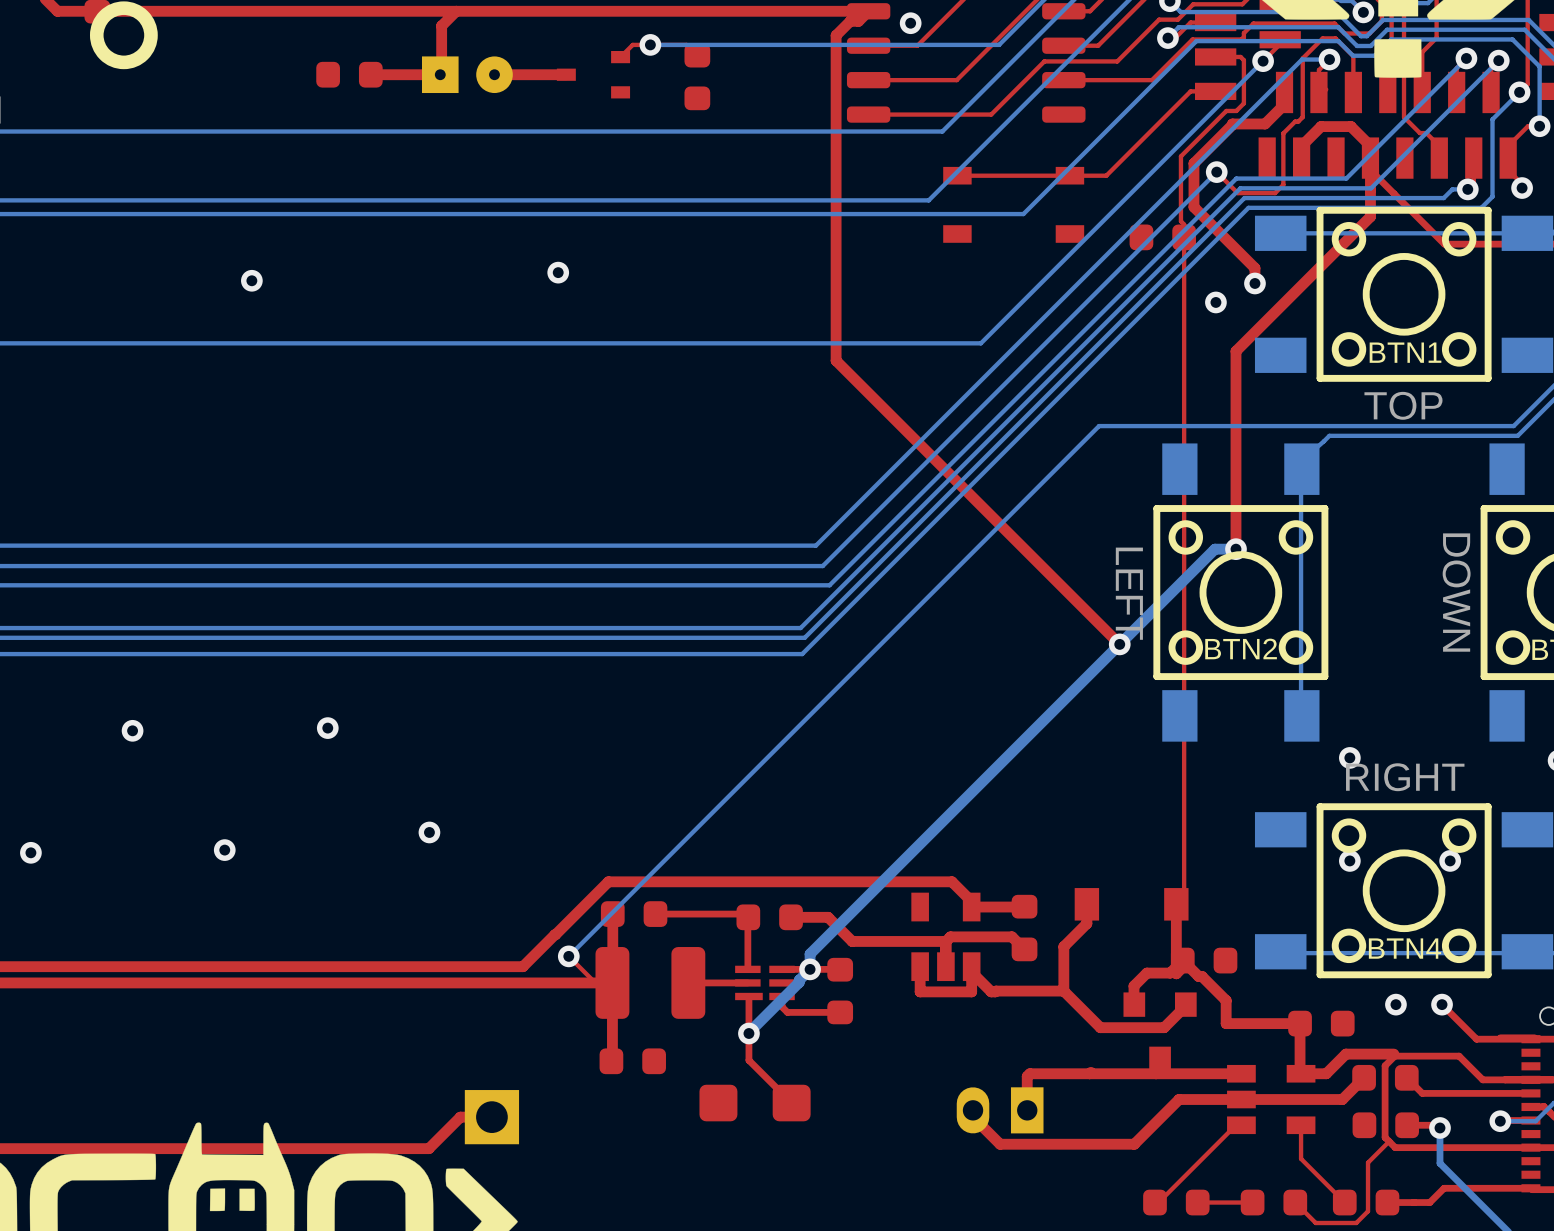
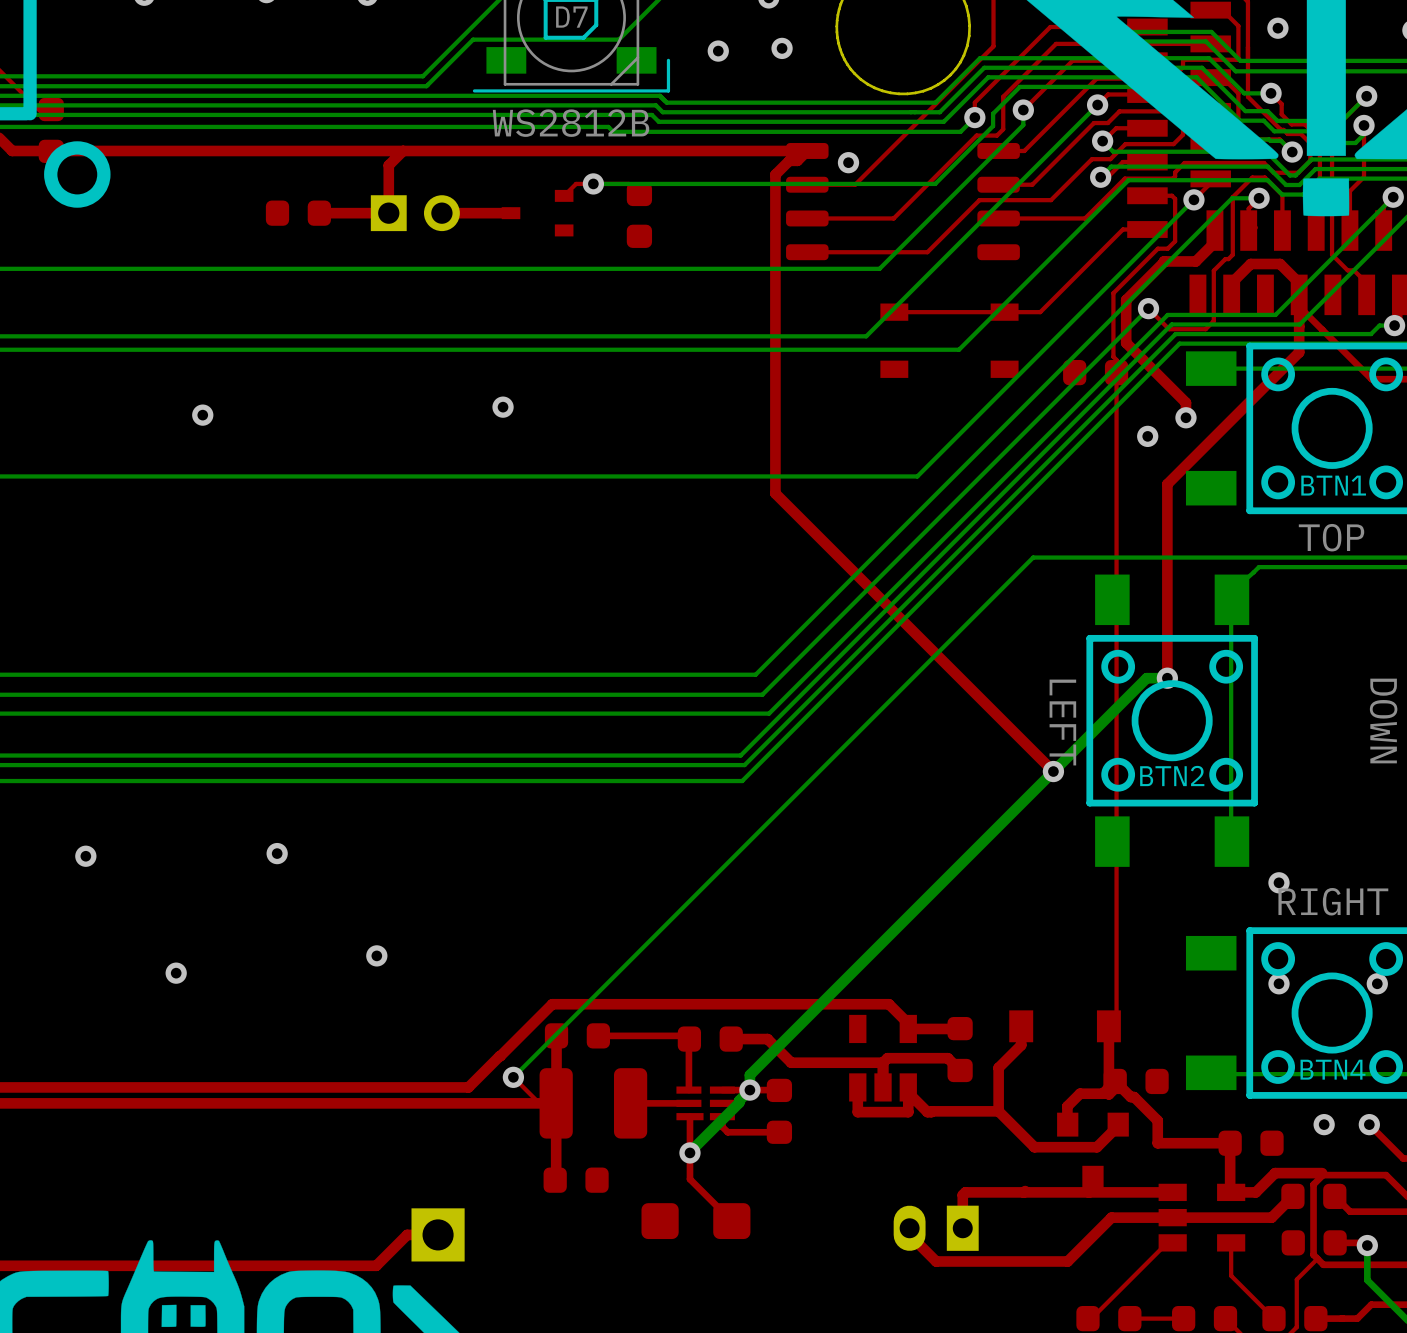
part footprint: [421, 56, 513, 94] -> [370, 195, 460, 232]

